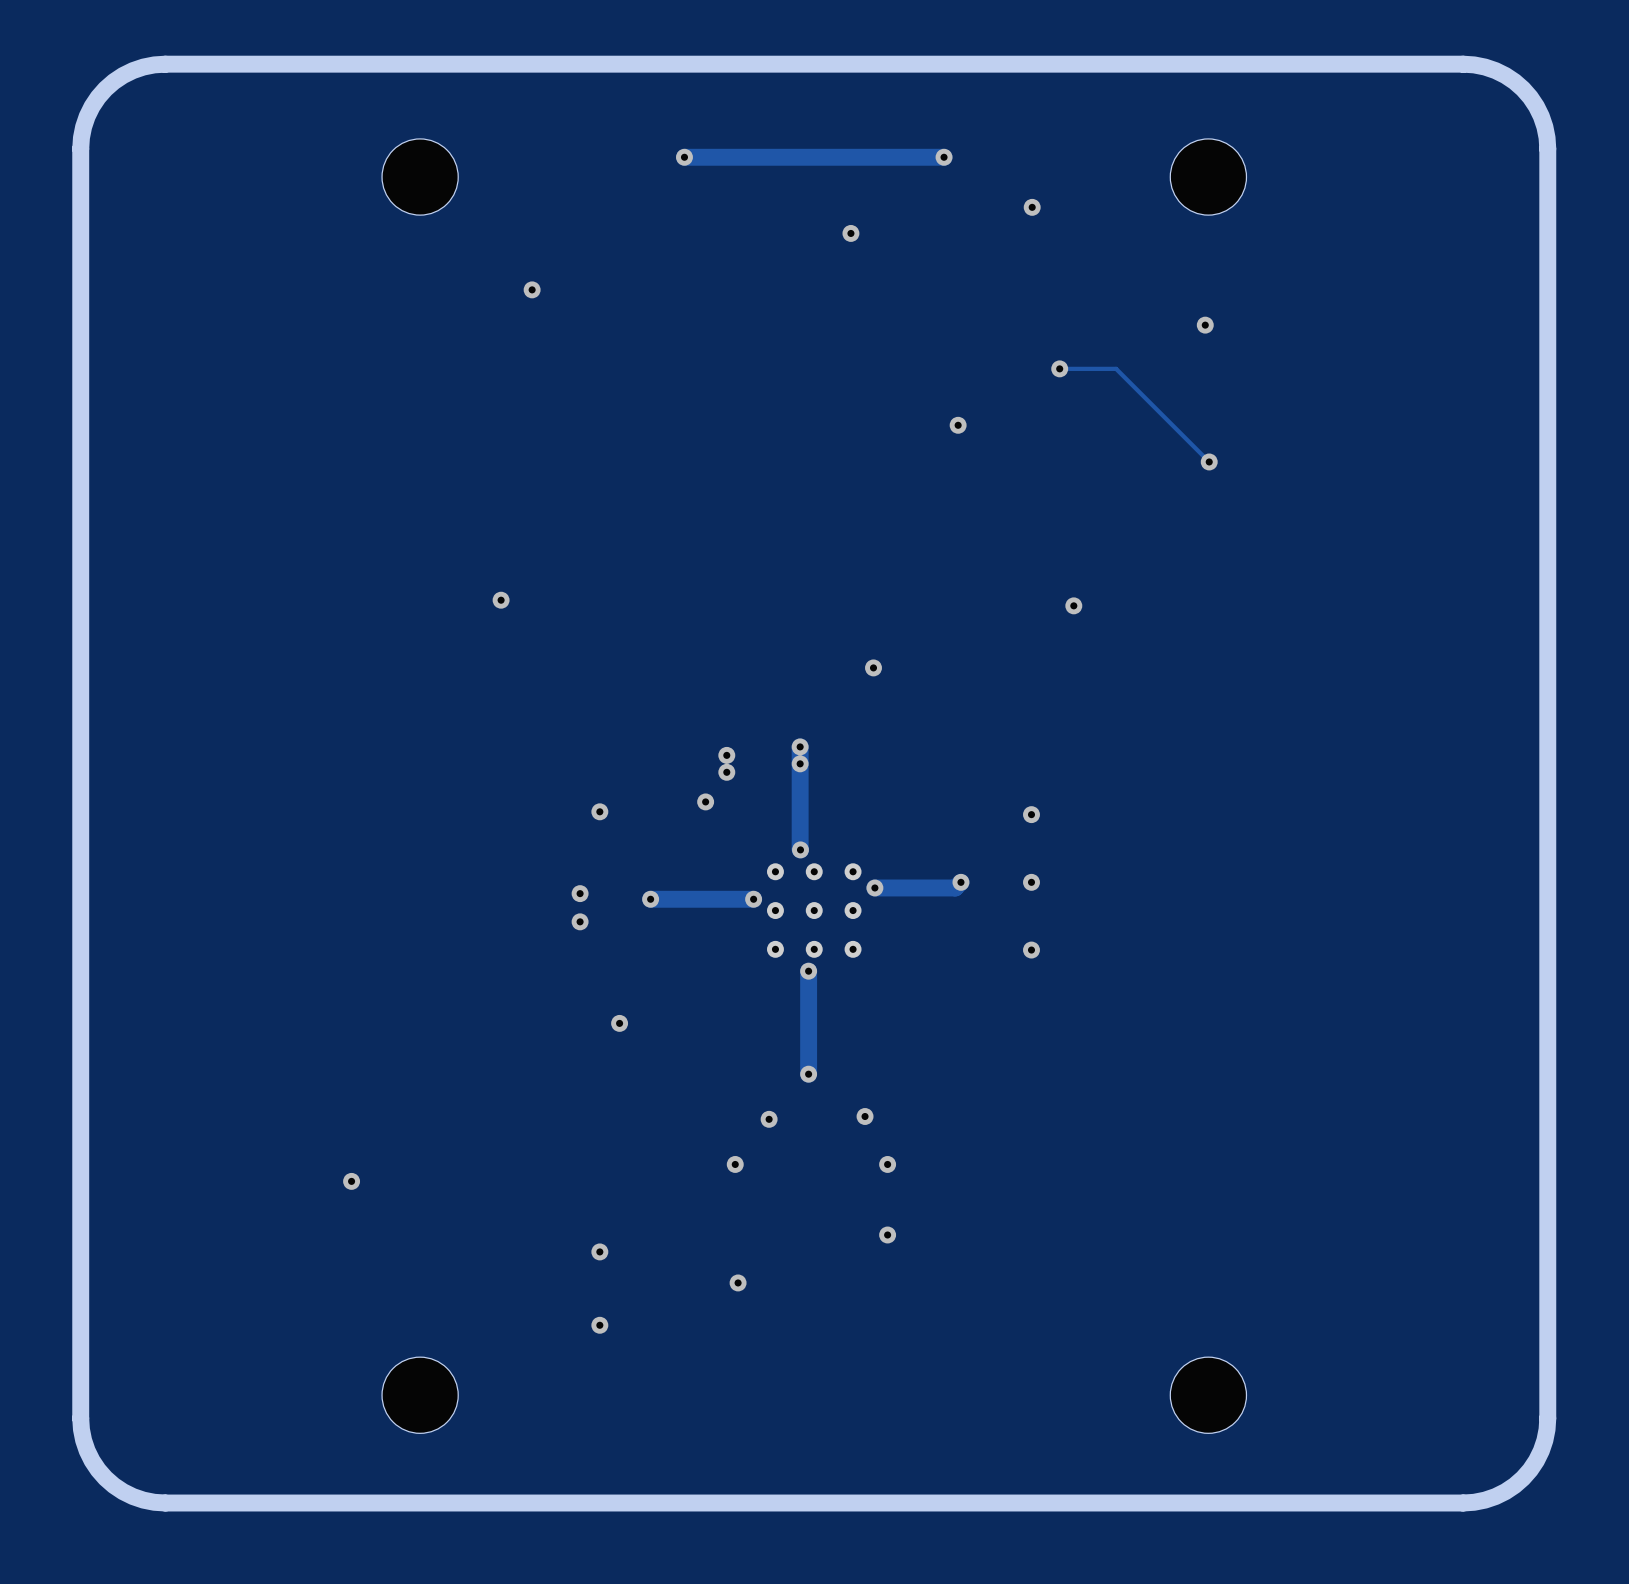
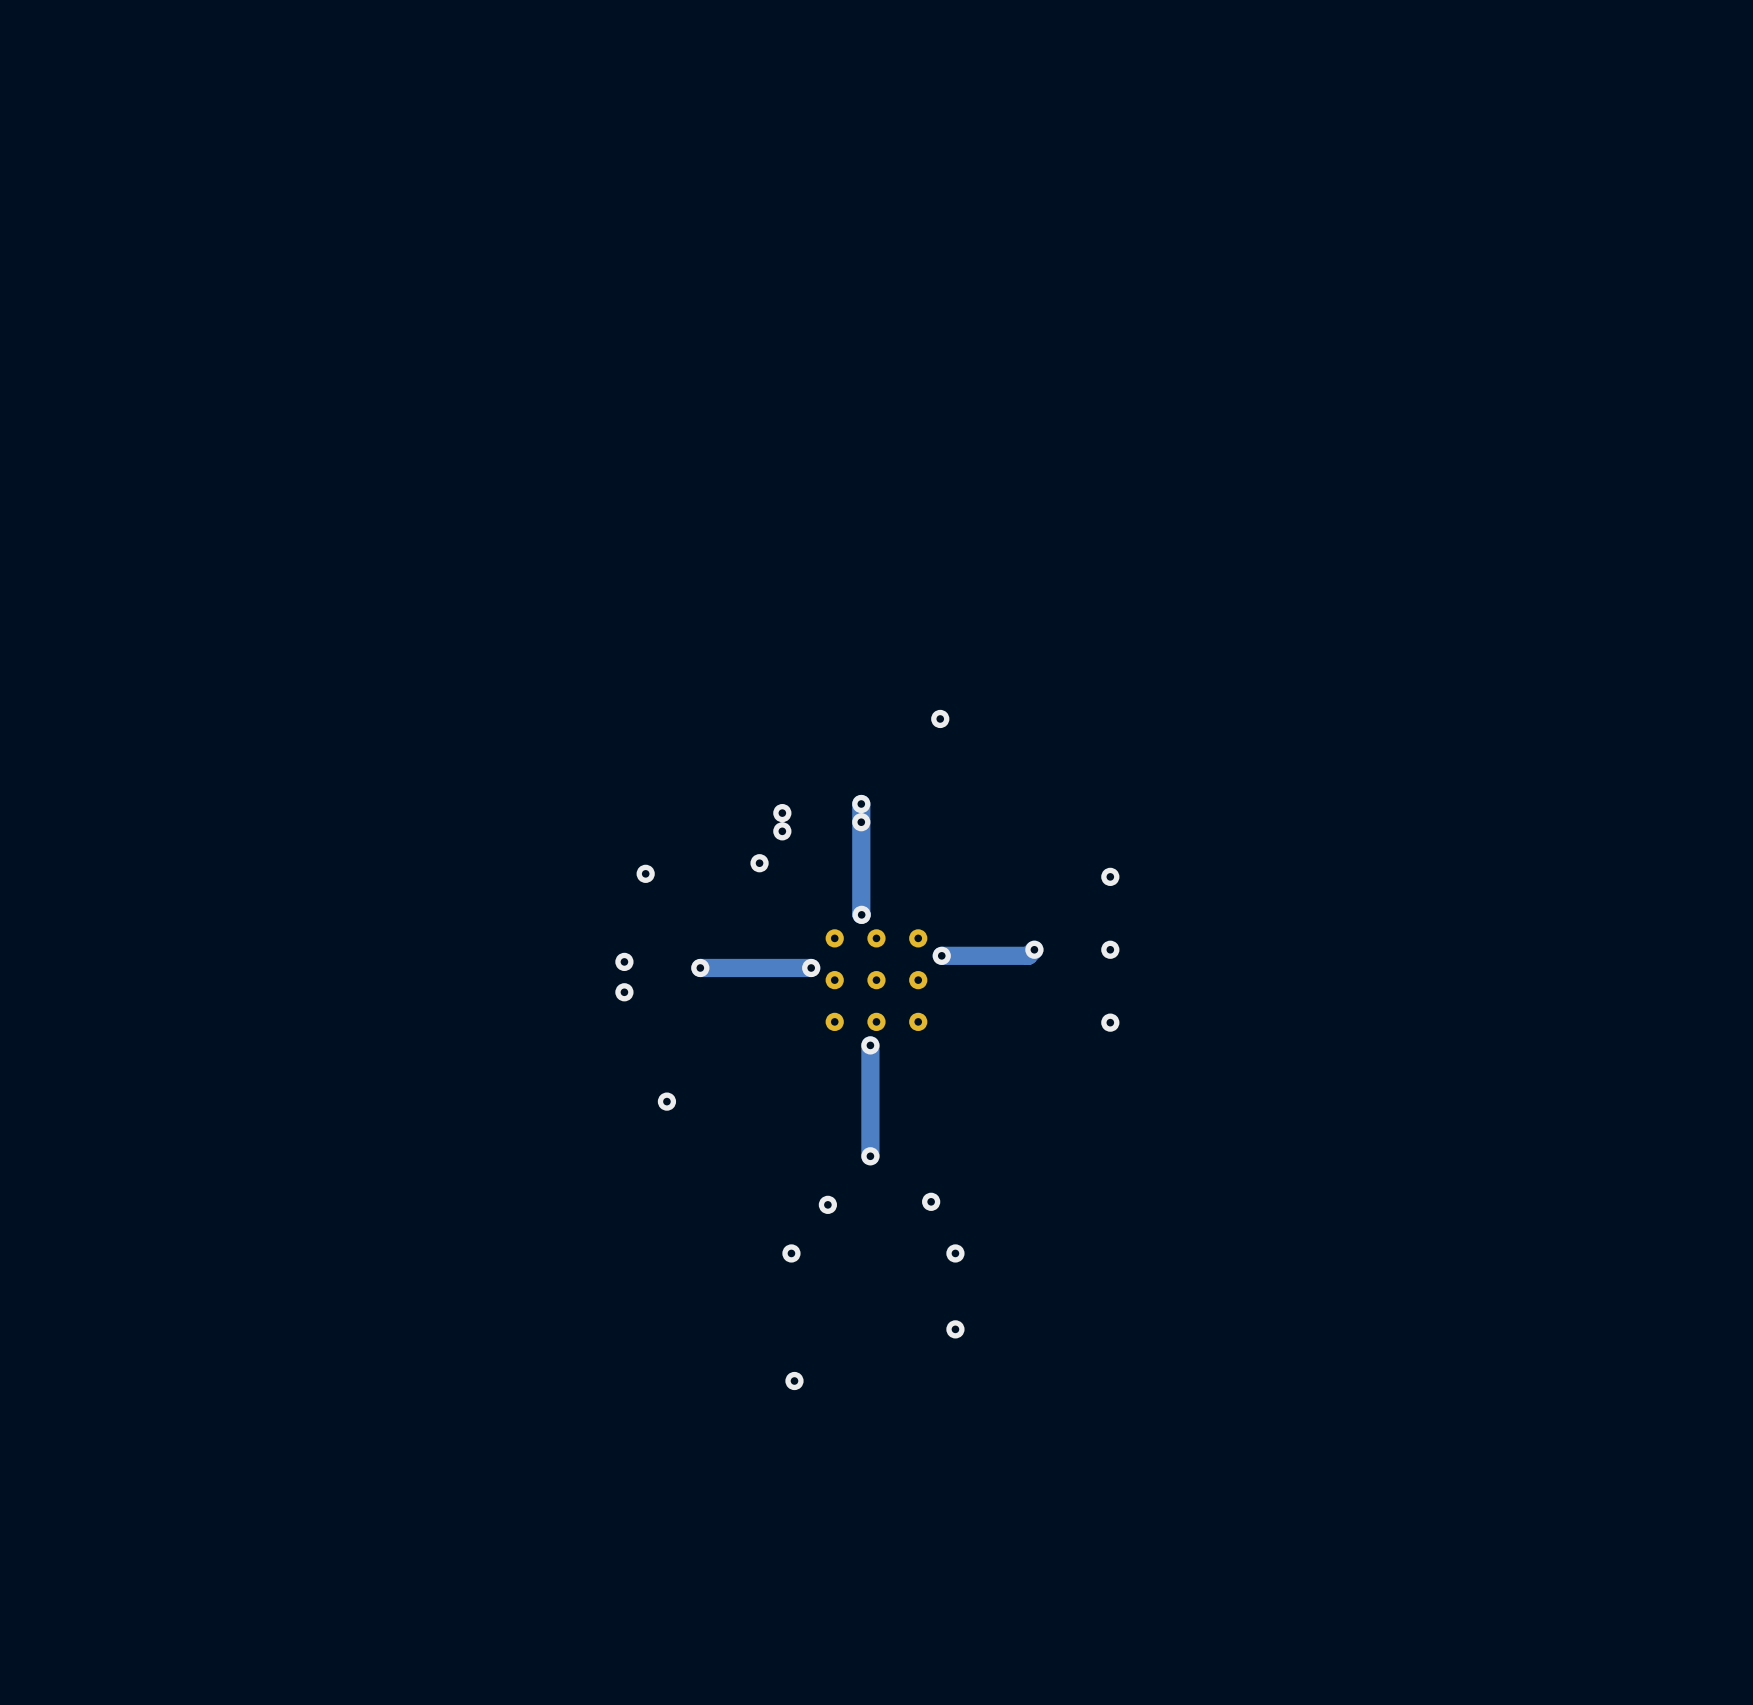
board edge: (1463, 64) (165, 64) (132, 70) (105, 88) (87, 116) (80, 148) (80, 1418) (87, 1450) (105, 1478) (132, 1496) (165, 1503) (1463, 1503) (1495, 1496) (1522, 1478) (1541, 1450) (1547, 1418) (1547, 148) (1541, 116) (1522, 88) (1495, 70) (1463, 64) -> none
via: (684, 157) -> none
track: (944, 157) (684, 157) -> none
via: (944, 157) -> none
part: (420, 177) -> none
part: (1208, 177) -> none
via: (1032, 207) -> none
via: (850, 233) -> none
via: (532, 289) -> none
via: (1205, 325) -> none
track: (1059, 368) (1116, 368) (1209, 461) -> none
via: (1059, 368) -> none
via: (958, 425) -> none
via: (1209, 461) -> none
via: (501, 600) -> none
via: (1073, 605) -> none
via: (351, 1181) -> none
via: (599, 1251) -> none
via: (599, 1325) -> none
part: (420, 1395) -> none
part: (1208, 1395) -> none

